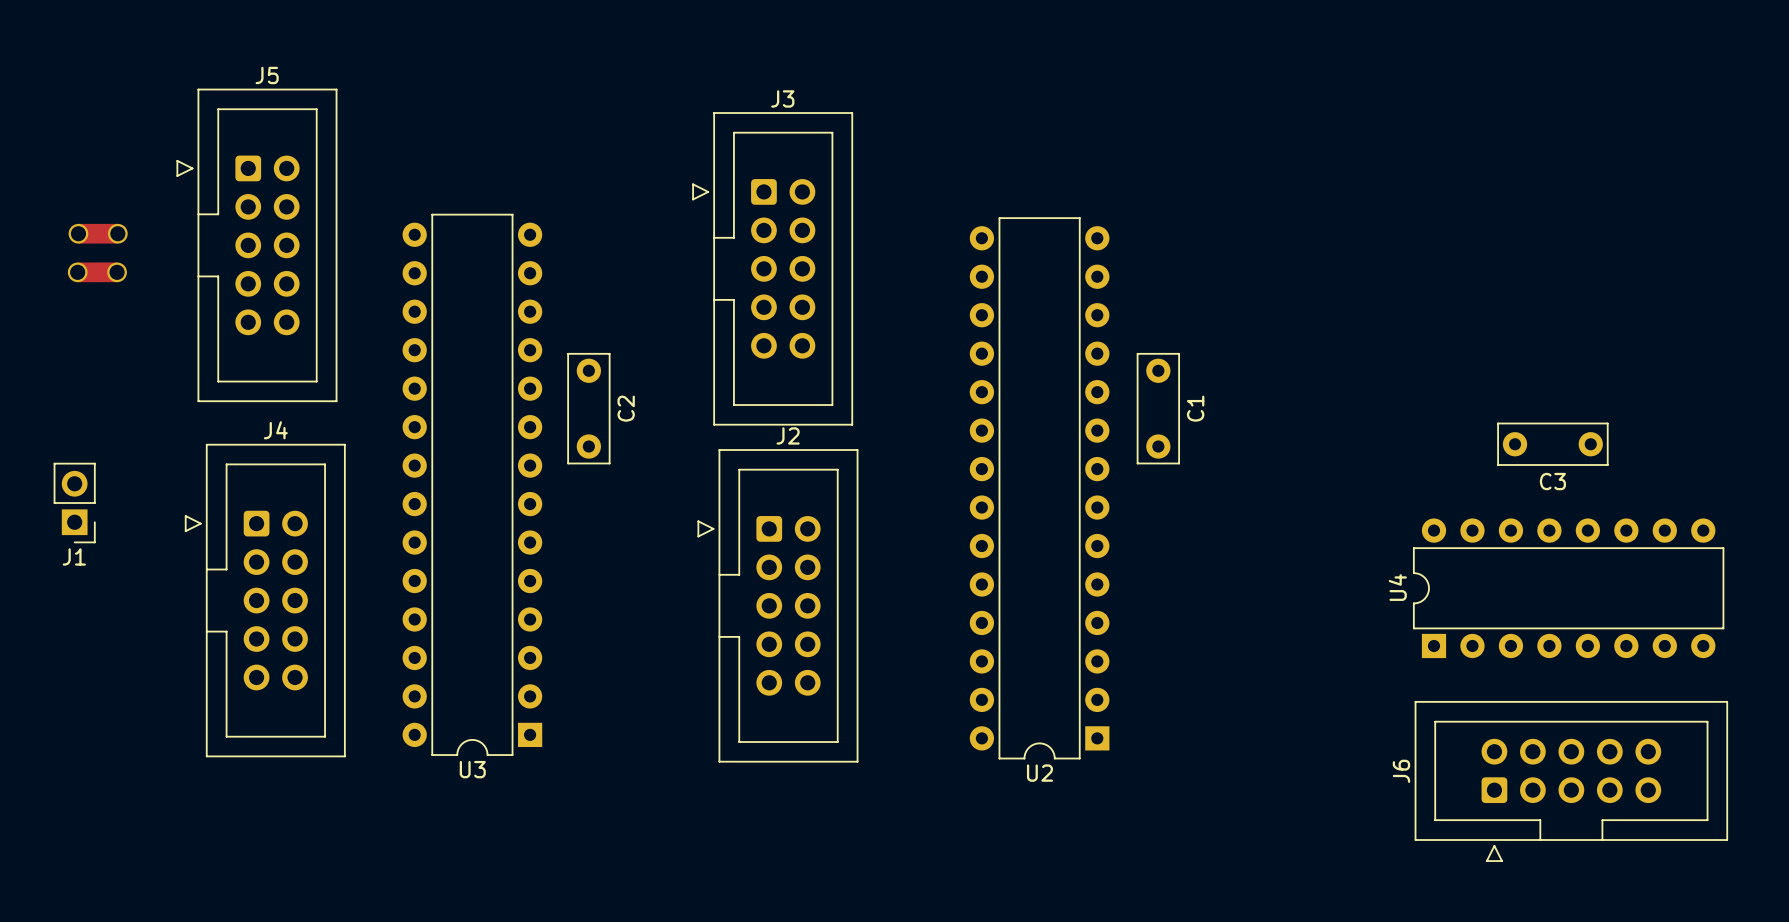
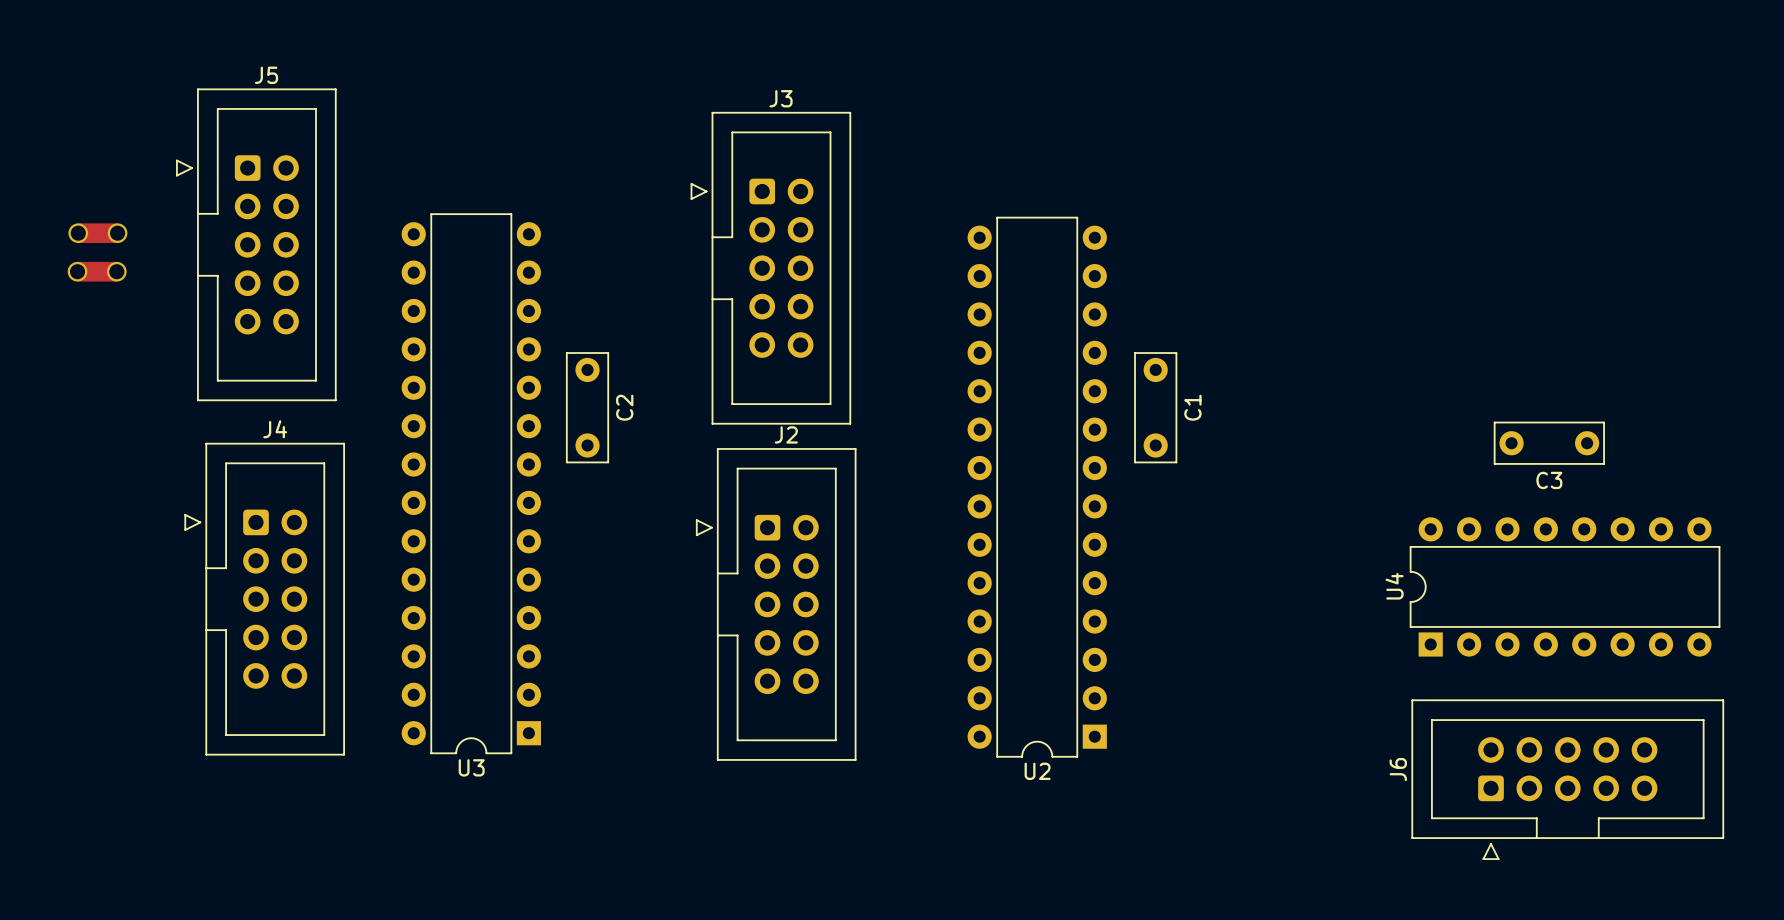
J1: (74, 503) -> none

